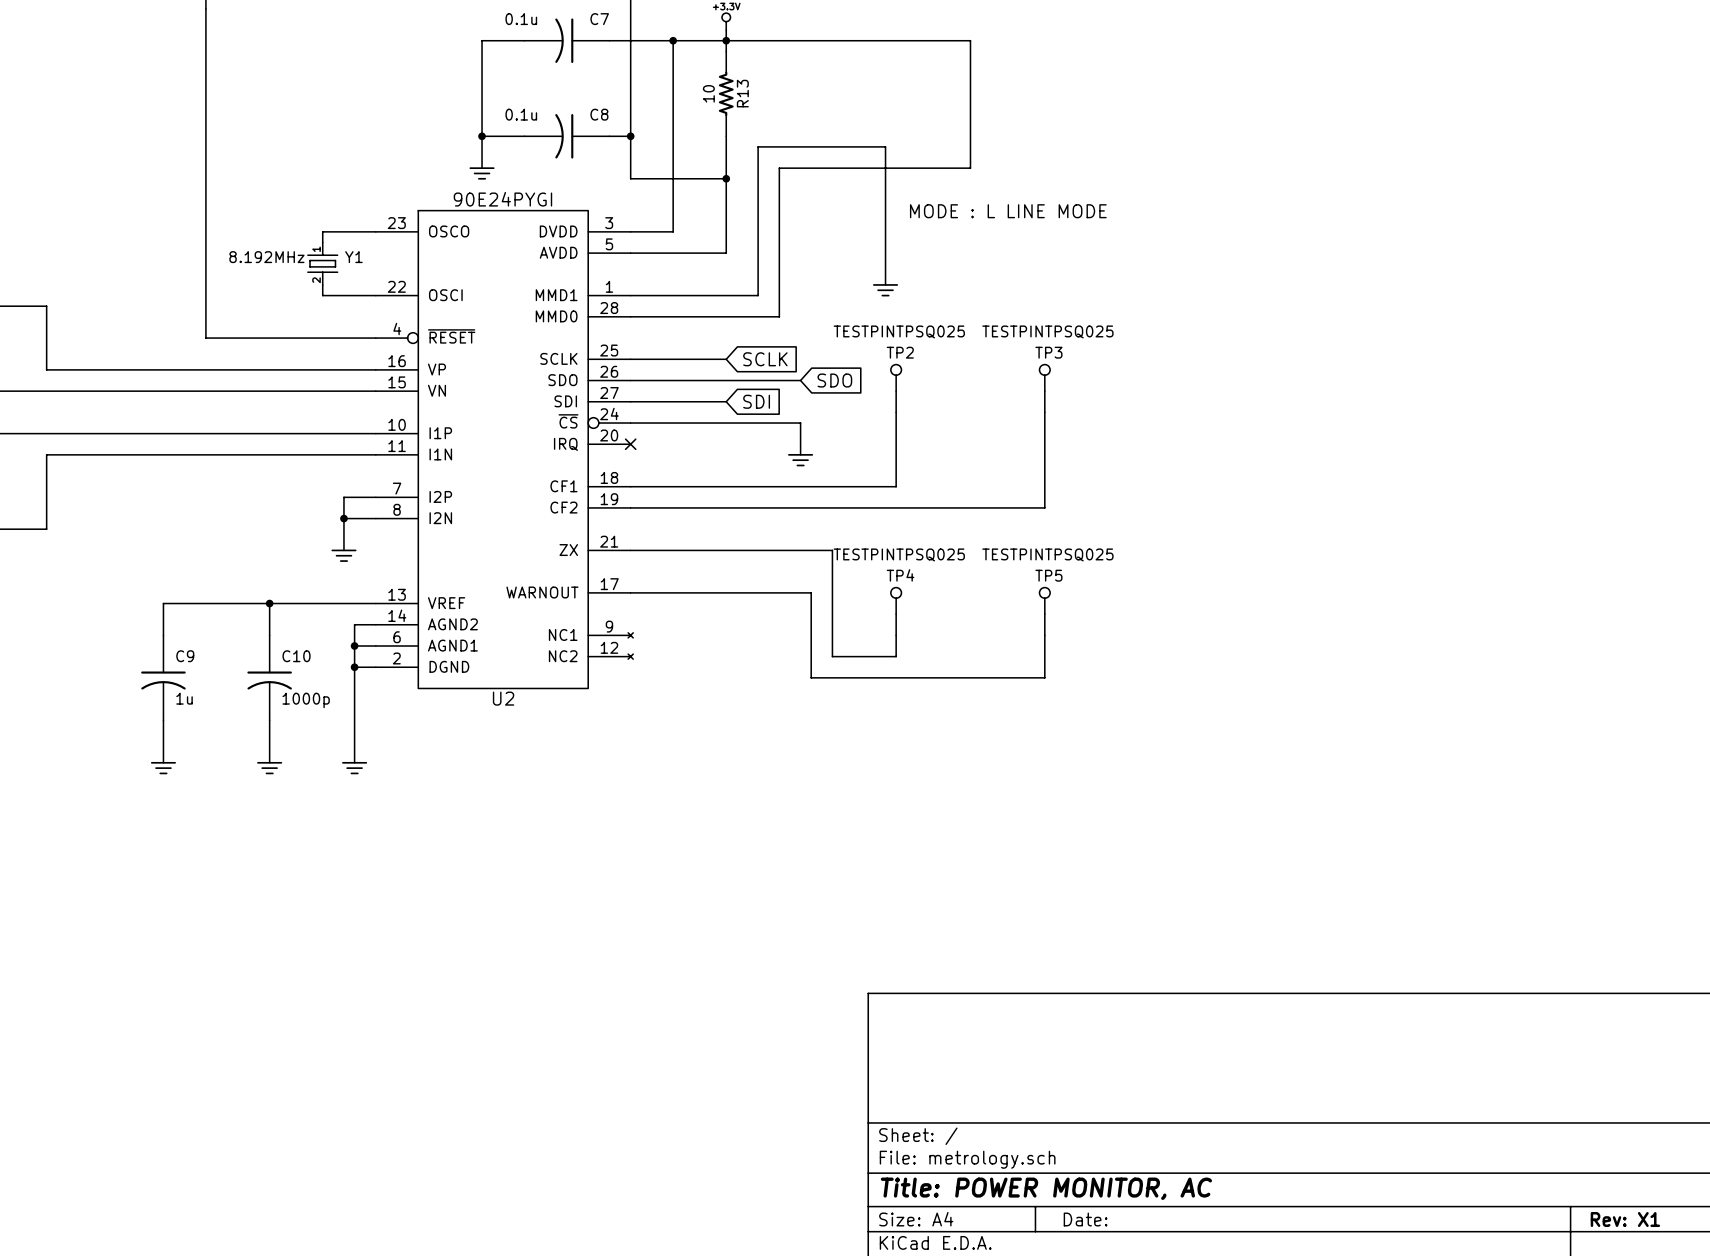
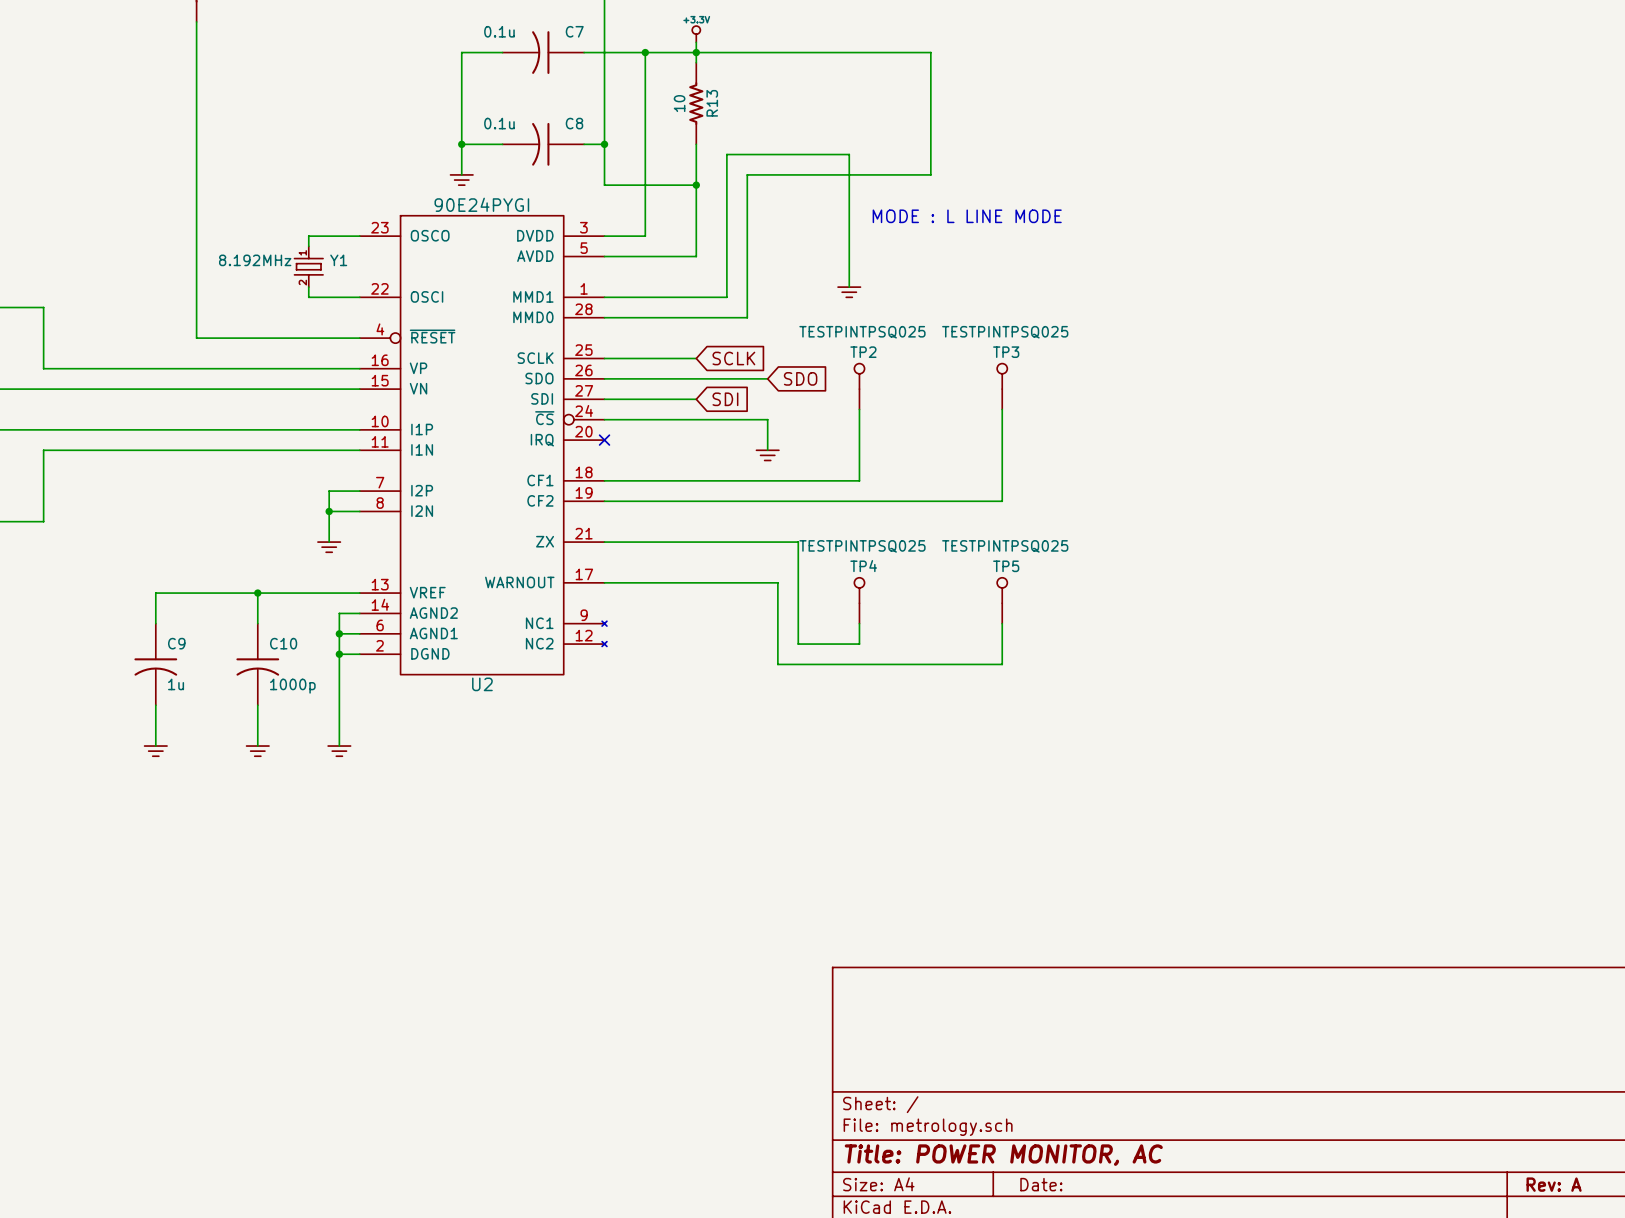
title block: Rev: X1 (1625, 1219) -> Rev: A (1554, 1184)

